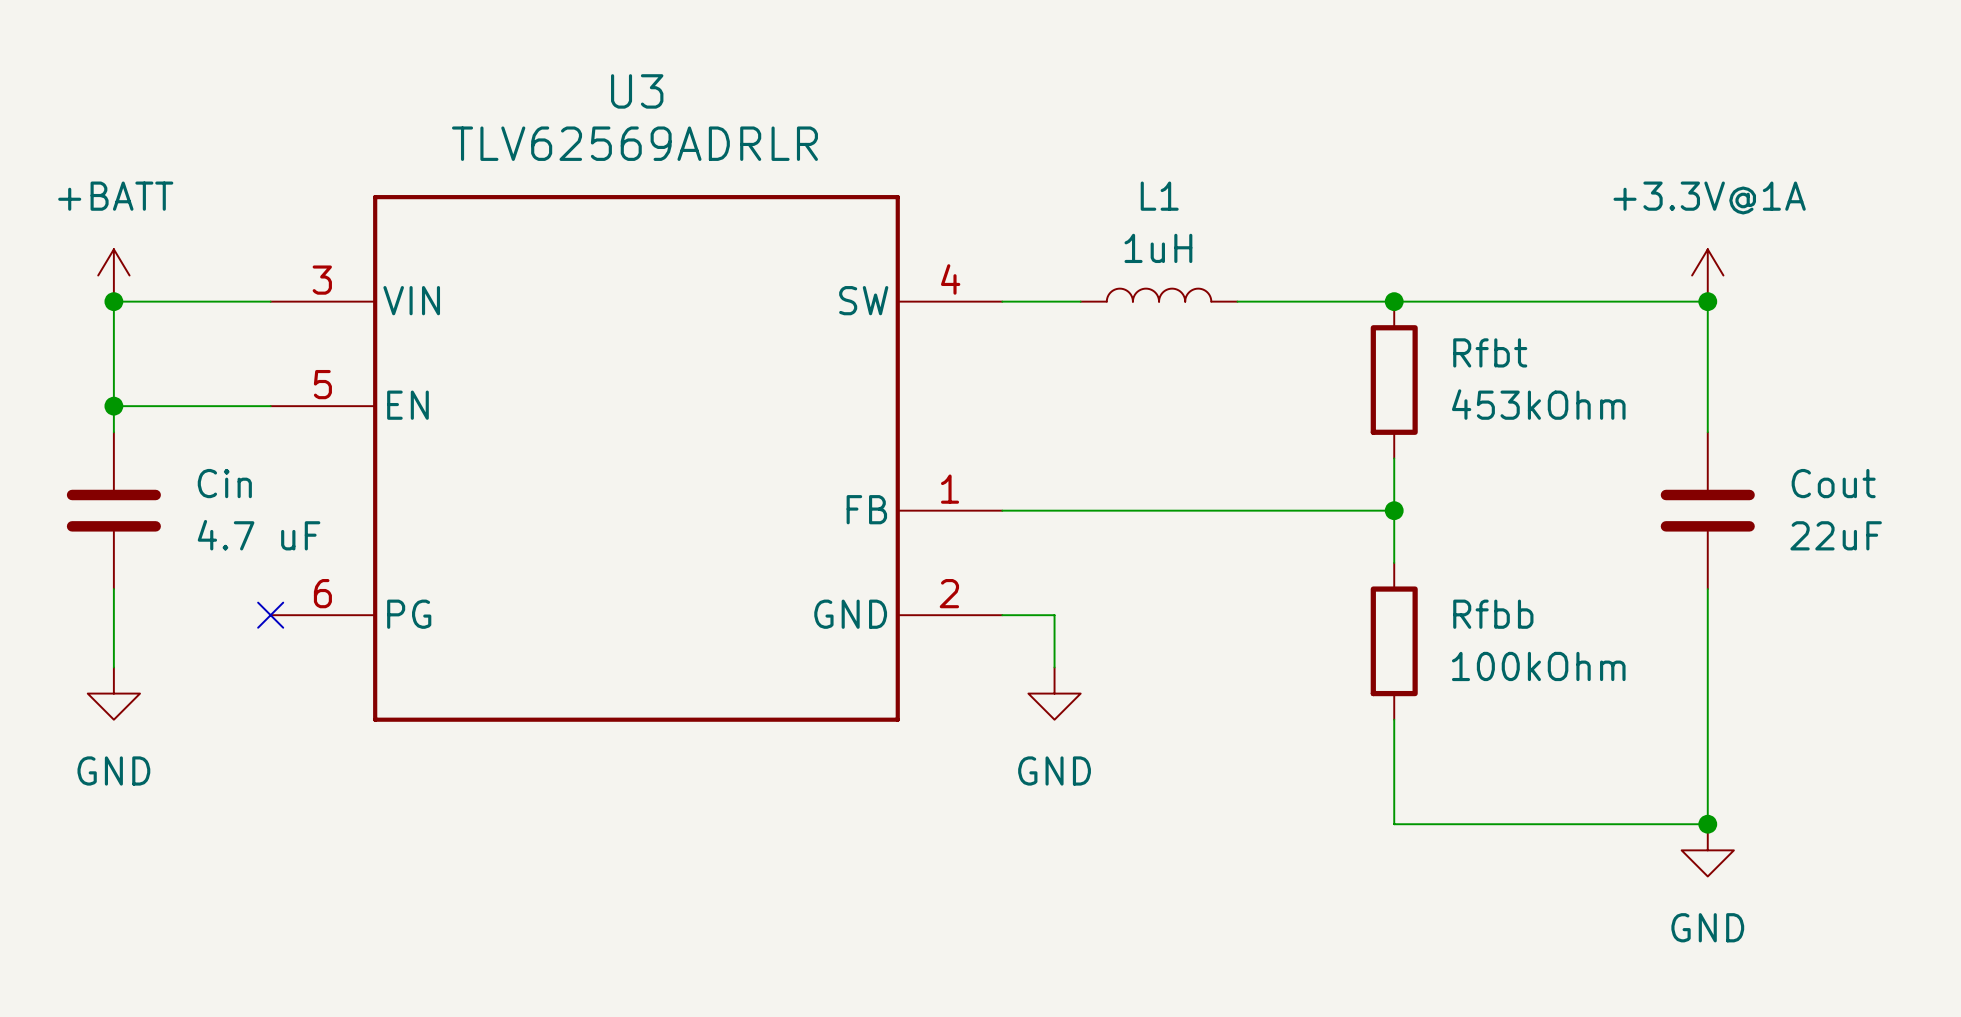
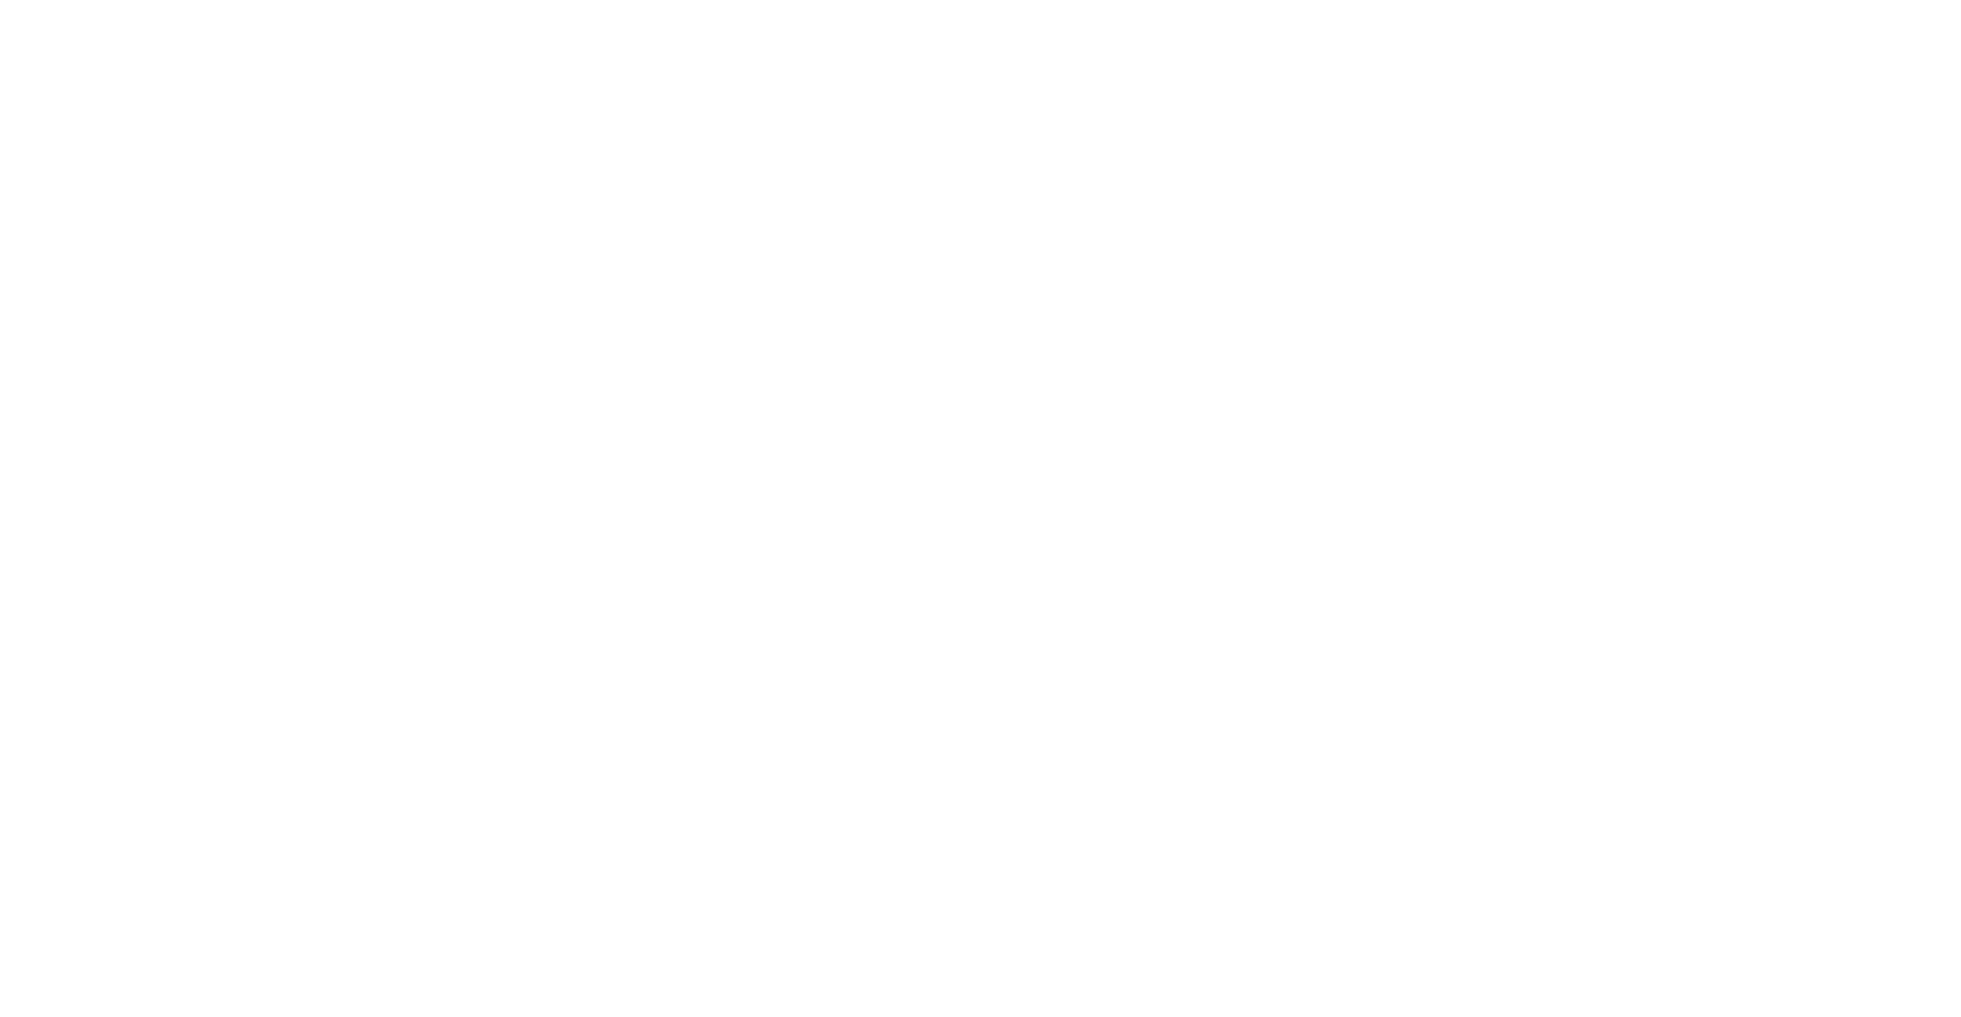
power symbol: +BATT (113, 275) -> none
power symbol: +3.3V@1A (1707, 275) -> none
L1: 1uH (1159, 295) -> none
junction: (113, 301) -> none
wire: (270, 301) (113, 301) (113, 432) -> none
wire: (1002, 301) (1080, 301) -> none
wire: (1237, 301) (1707, 301) (1707, 432) -> none
junction: (1394, 301) -> none
junction: (1707, 301) -> none
Rfbt: 453kOhm (1394, 380) -> none
wire: (113, 406) (270, 406) -> none
junction: (113, 406) -> none
U3: TLV62569ADRLR (636, 458) -> none
wire: (1394, 458) (1394, 562) -> none
Cin: 4.7 uF (113, 510) -> none
wire: (1002, 510) (1394, 510) -> none
junction: (1394, 510) -> none
Cout: 22uF (1707, 510) -> none
wire: (113, 589) (113, 667) -> none
wire: (1707, 589) (1707, 824) (1394, 824) (1394, 719) -> none
no-connect mark: (270, 615) -> none
wire: (1002, 615) (1054, 615) (1054, 667) -> none
Rfbb: 100kOhm (1394, 641) -> none
power symbol: GND (113, 693) -> none
power symbol: GND (1054, 693) -> none
junction: (1707, 824) -> none
power symbol: GND (1707, 850) -> none

